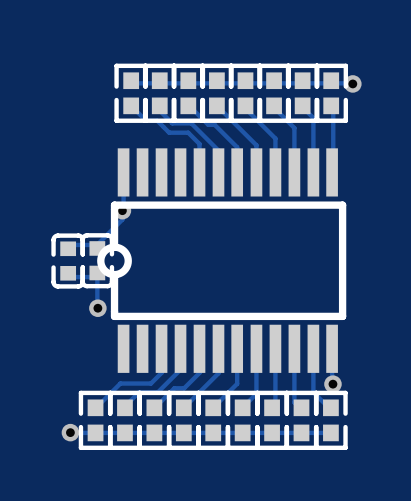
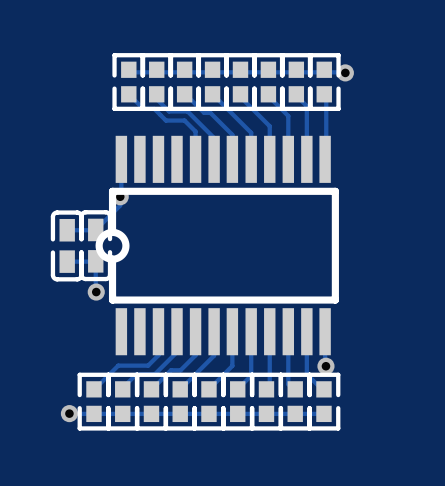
part footprint: [51, 233, 85, 289] -> [50, 210, 84, 282]
part footprint: [80, 233, 115, 289] -> [79, 210, 113, 282]

